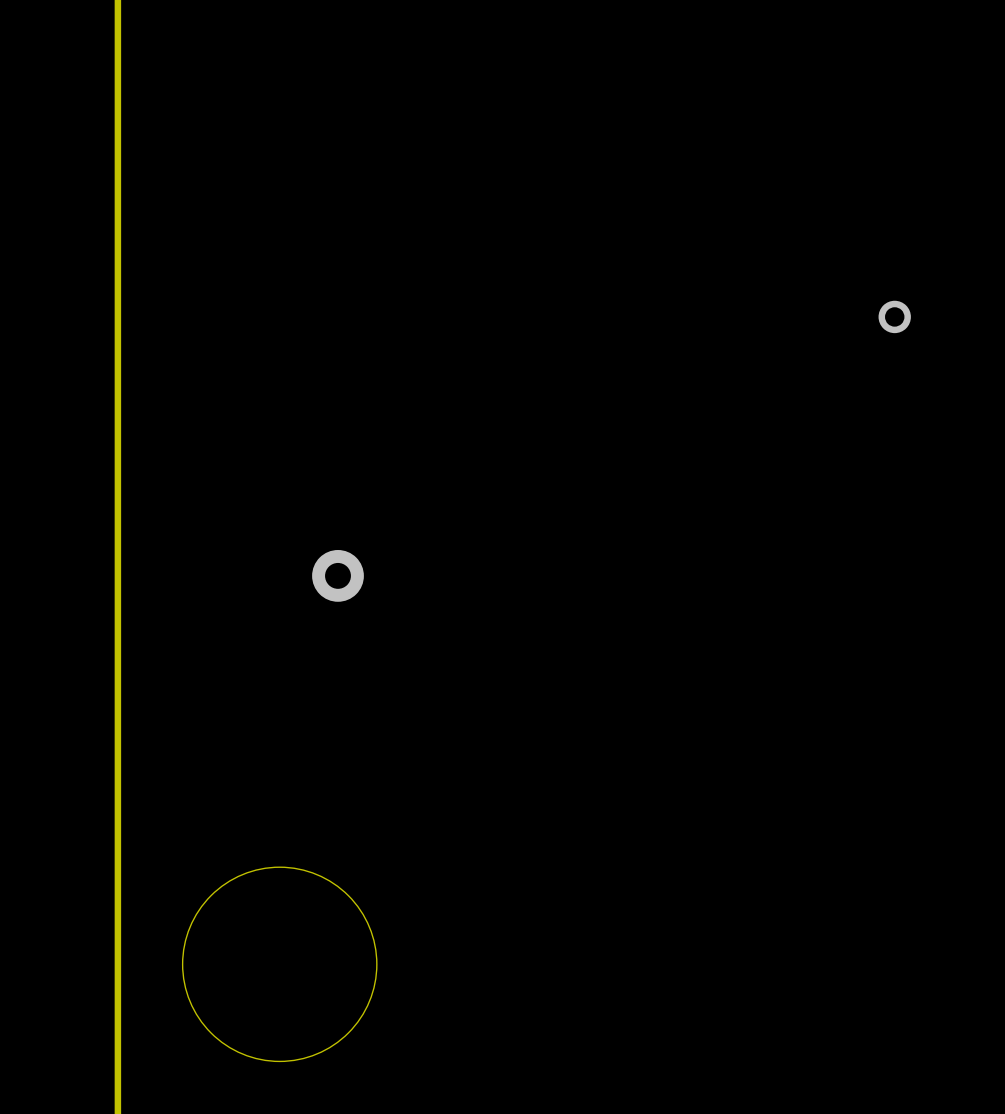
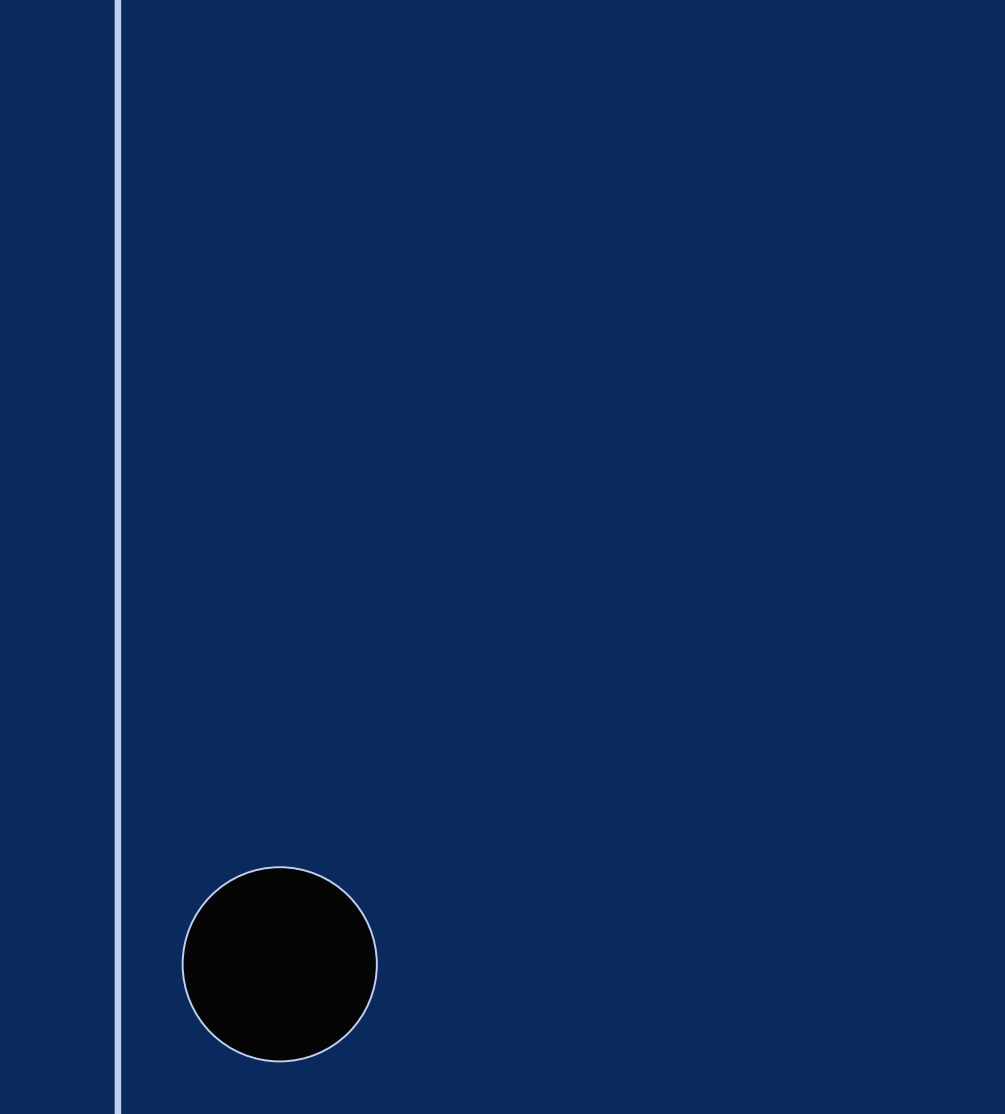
via: (894, 316) -> none
via: (337, 575) -> none

